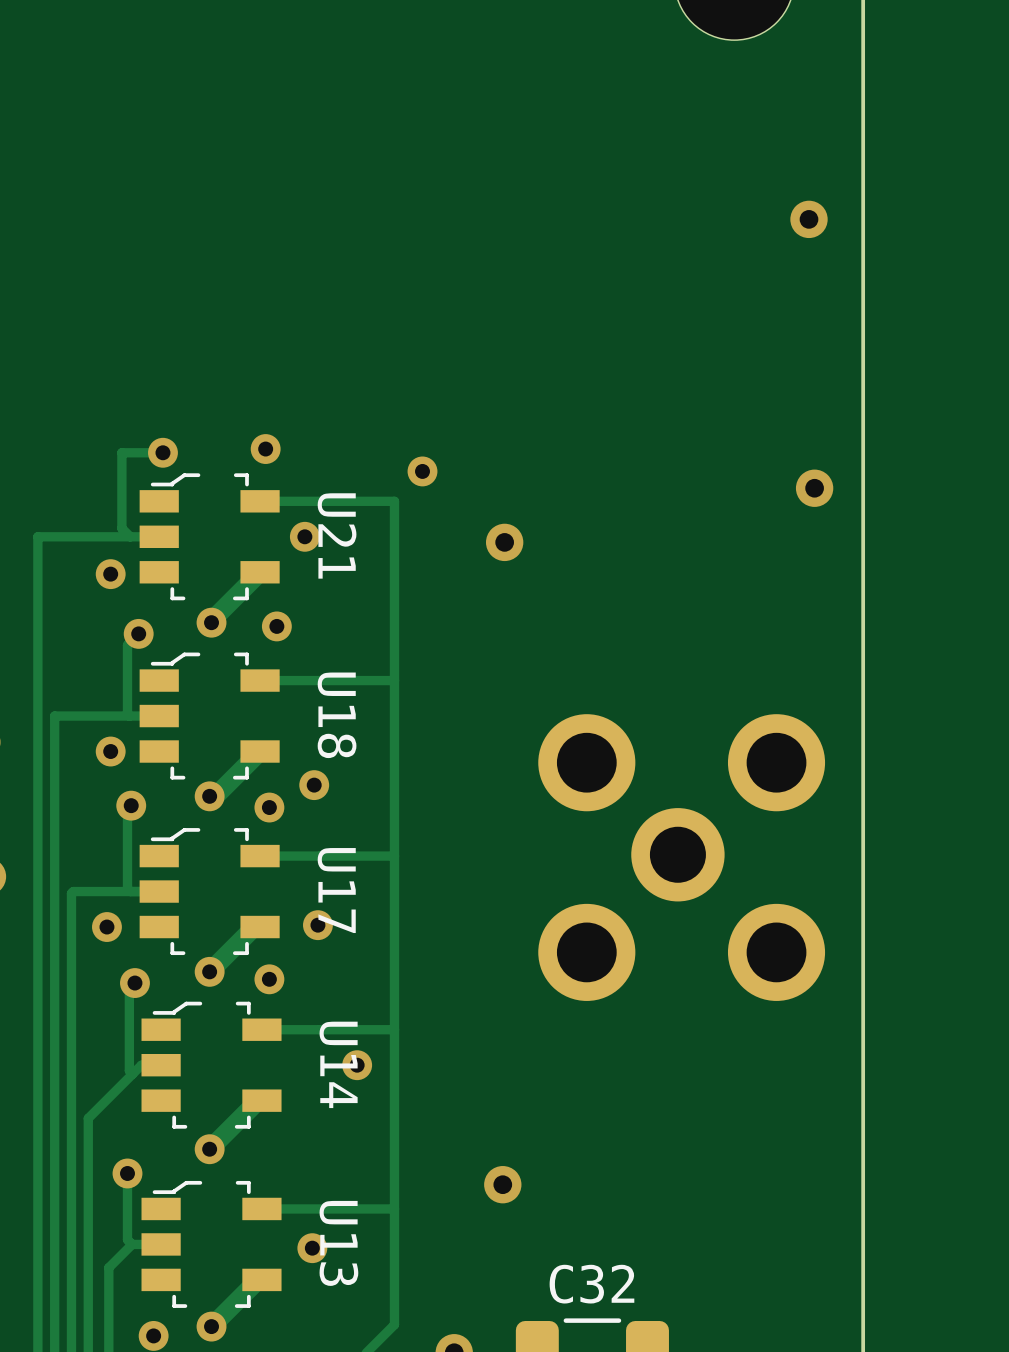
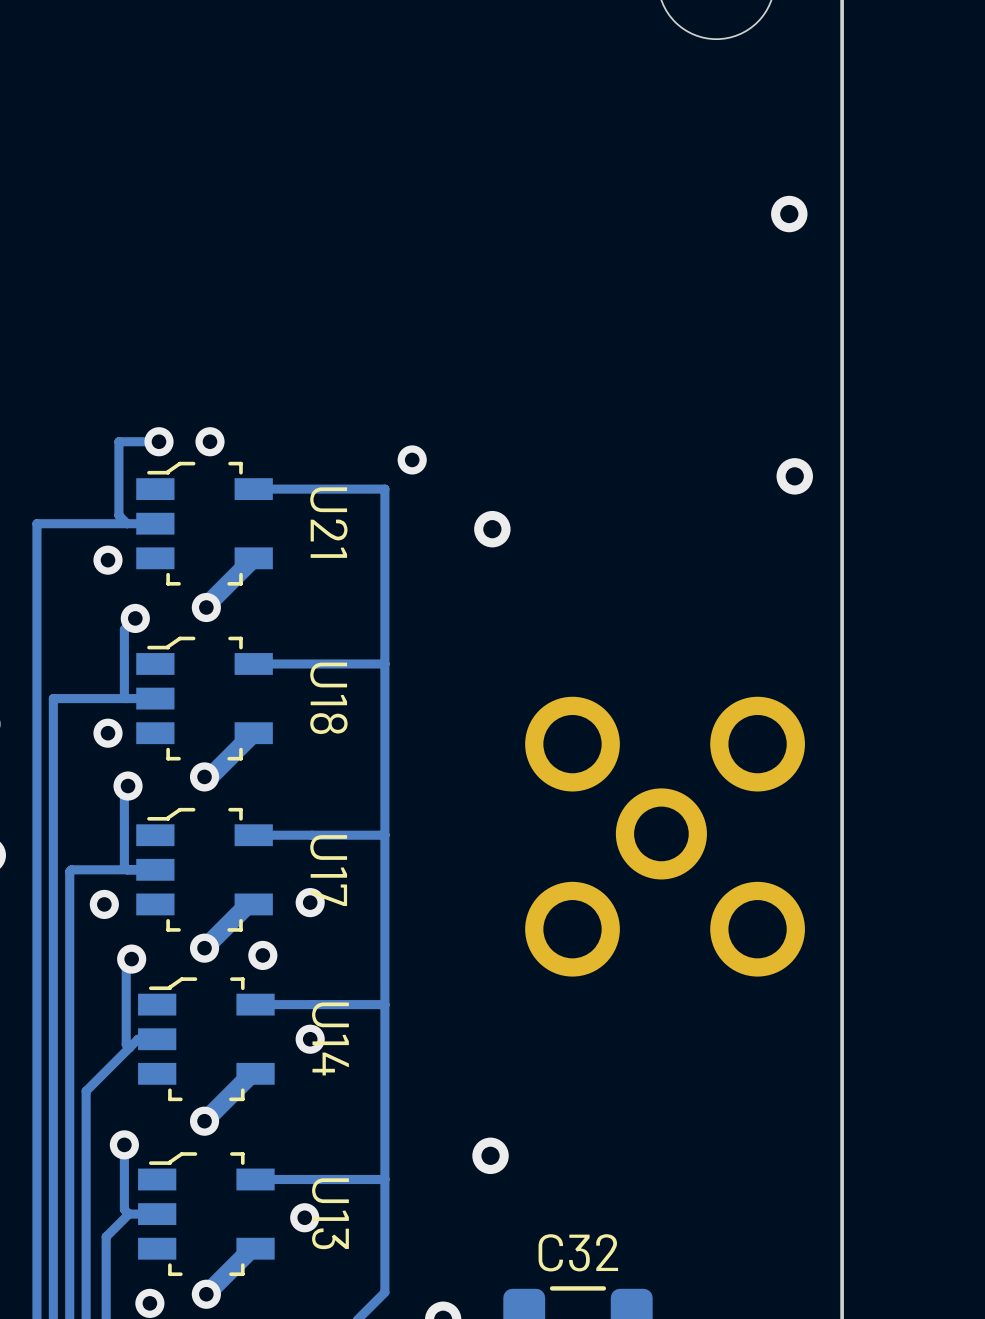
via position: (265, 449) -> (210, 441)
via: (304, 536) -> none
via: (276, 626) -> none
via: (314, 785) -> none
via: (269, 807) -> none
via position: (357, 1065) -> (310, 1039)

